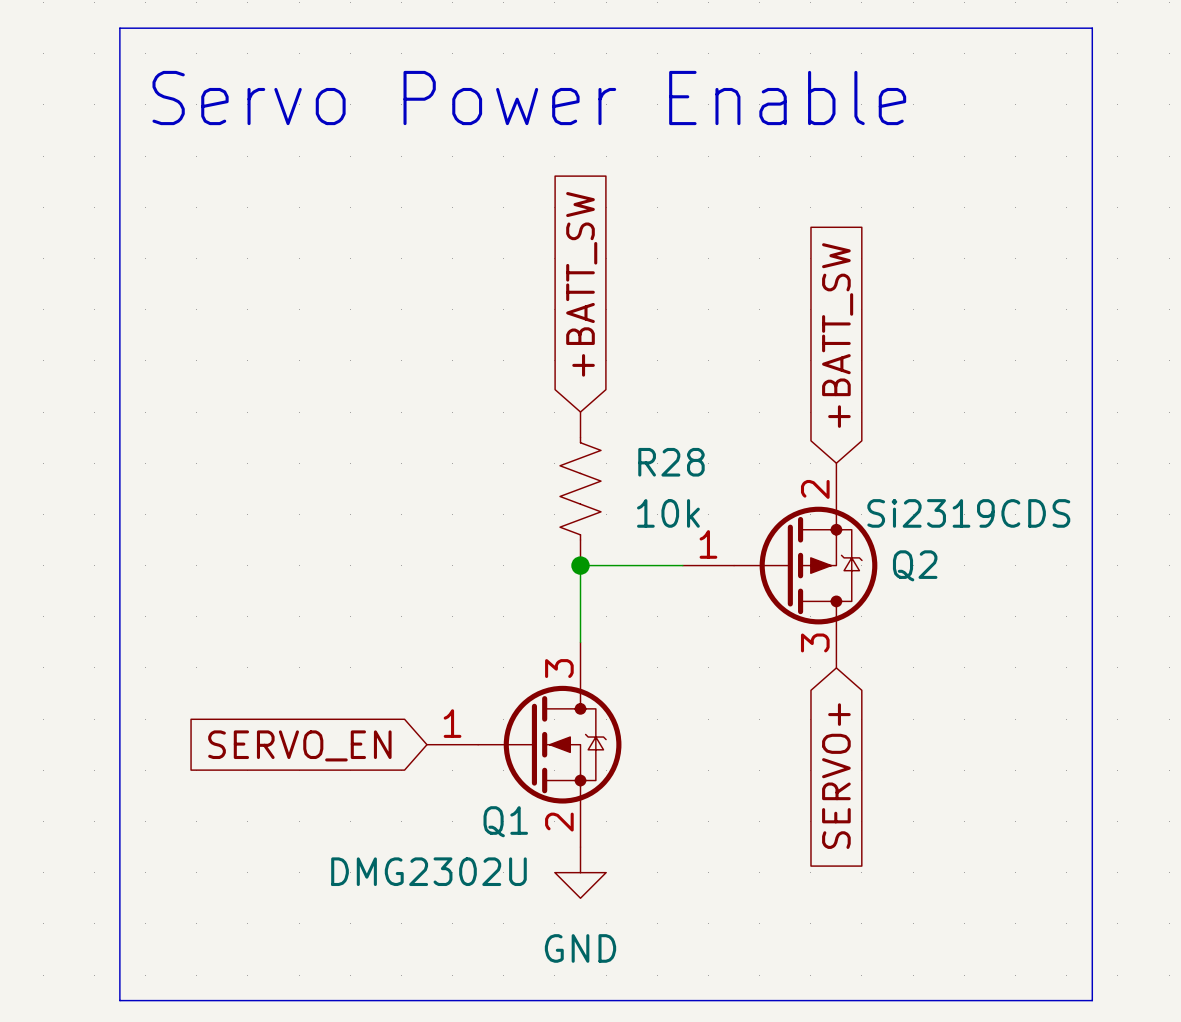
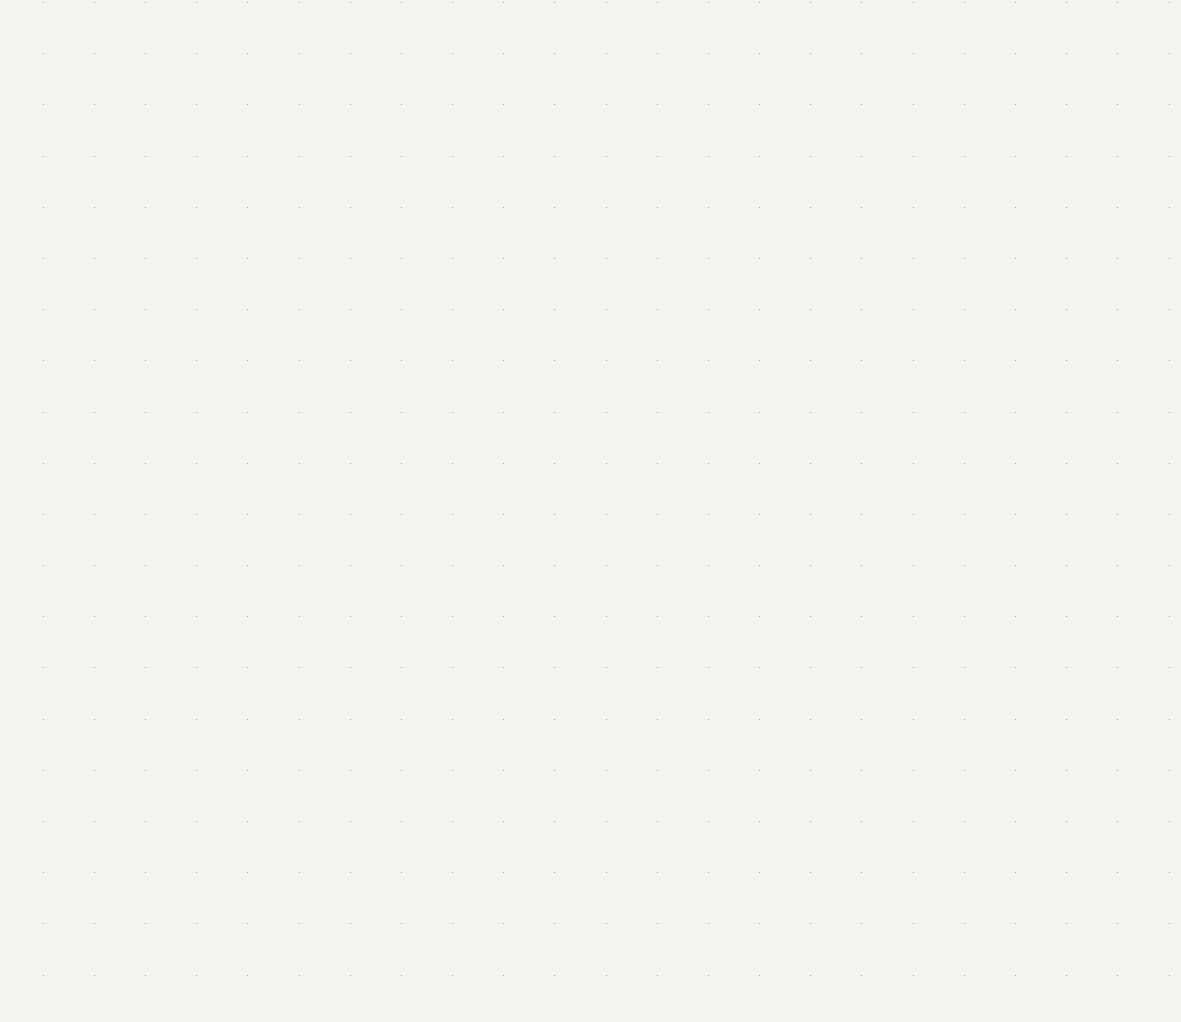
line: (119, 28) (1092, 28) (1092, 1000) (119, 1000) (119, 28) -> none
text: Servo Power Enable (529, 98) -> none
global label: +BATT_SW (581, 284) -> none
global label: +BATT_SW (837, 335) -> none
R28: 10k (580, 488) -> none
junction: (580, 565) -> none
wire: (682, 565) (580, 565) (580, 642) -> none
Q2: Si2319CDS (780, 565) -> none
Q1: DMG2302U (524, 744) -> none
global label: SERVO_EN (299, 745) -> none
global label: SERVO+ (836, 776) -> none
power symbol: GND (580, 872) -> none

